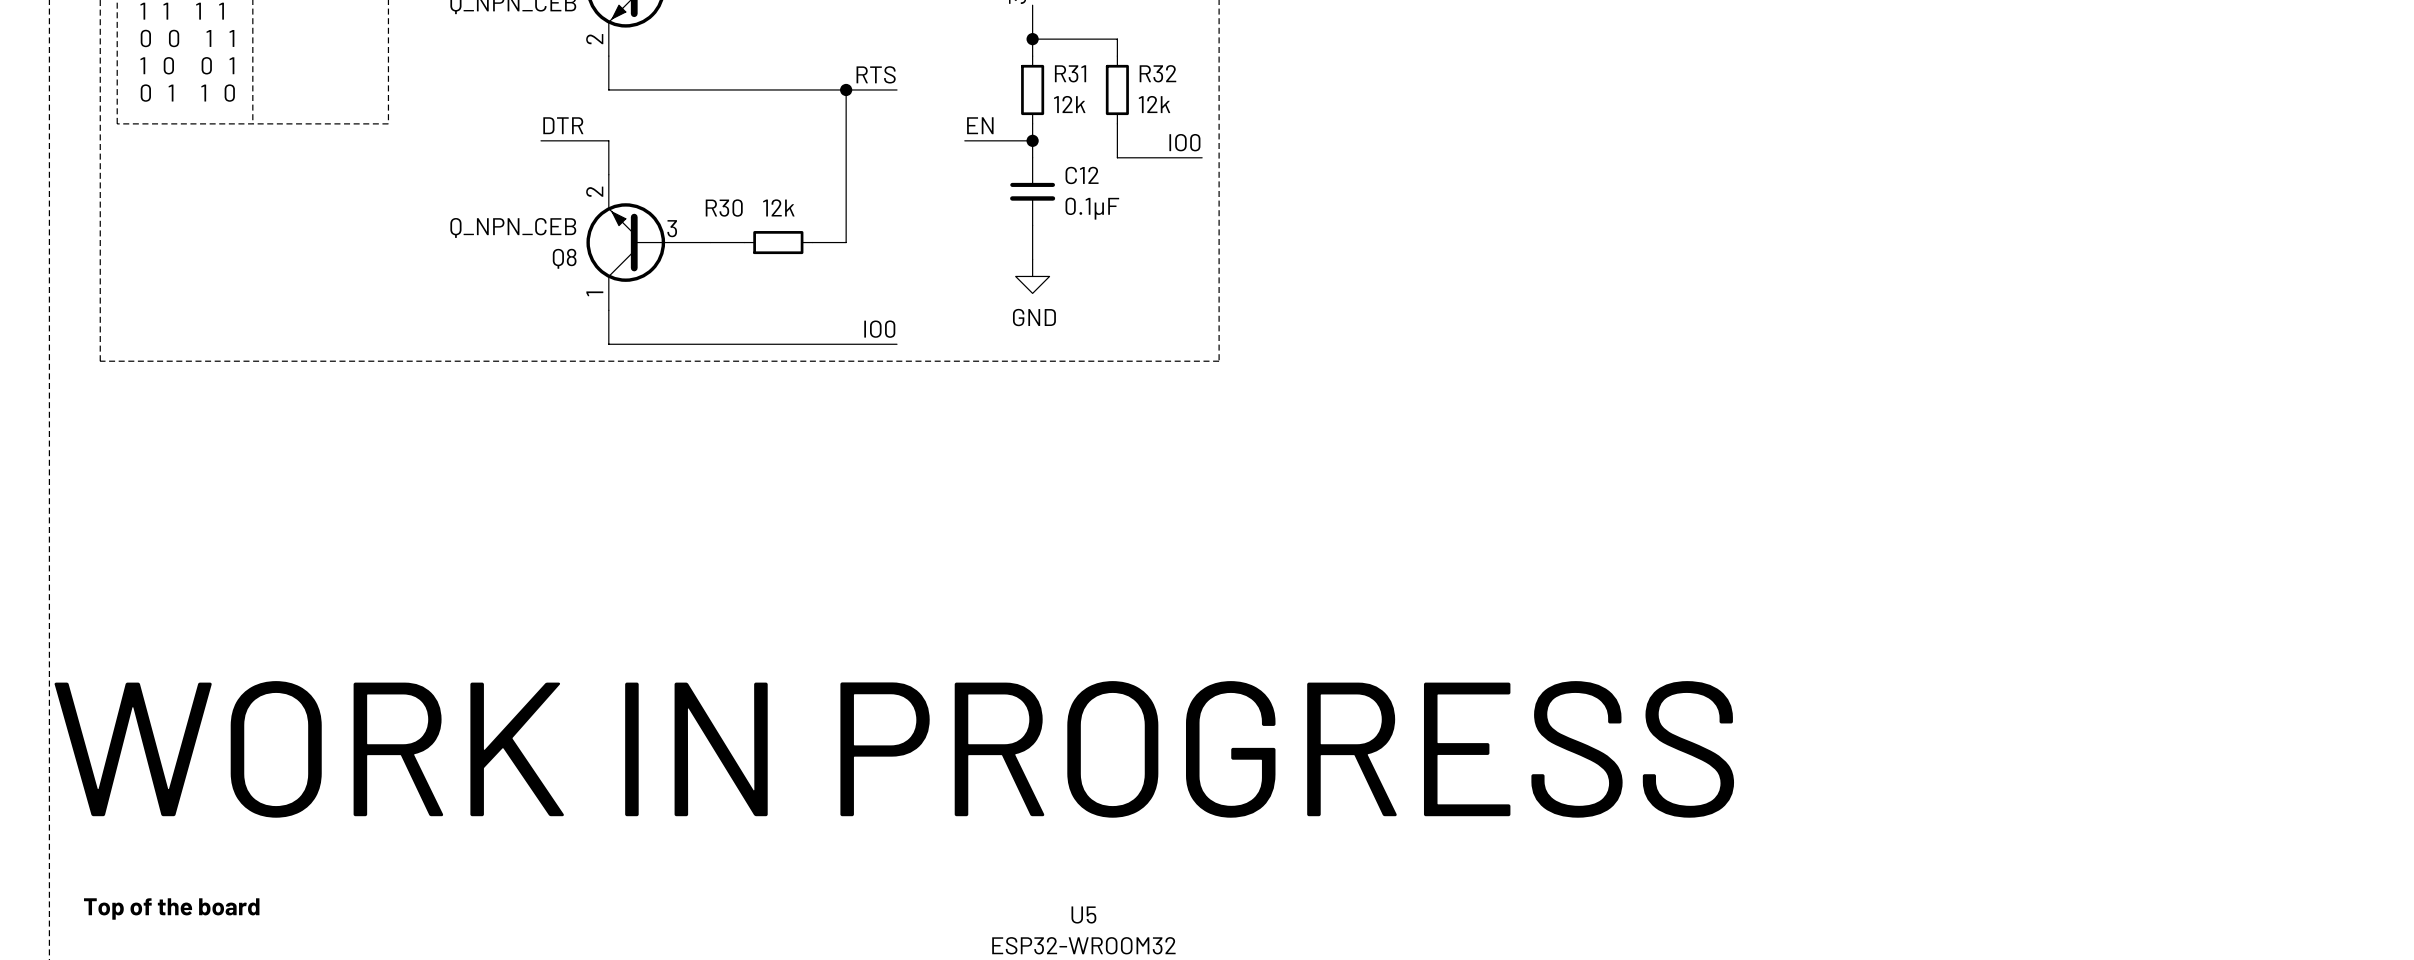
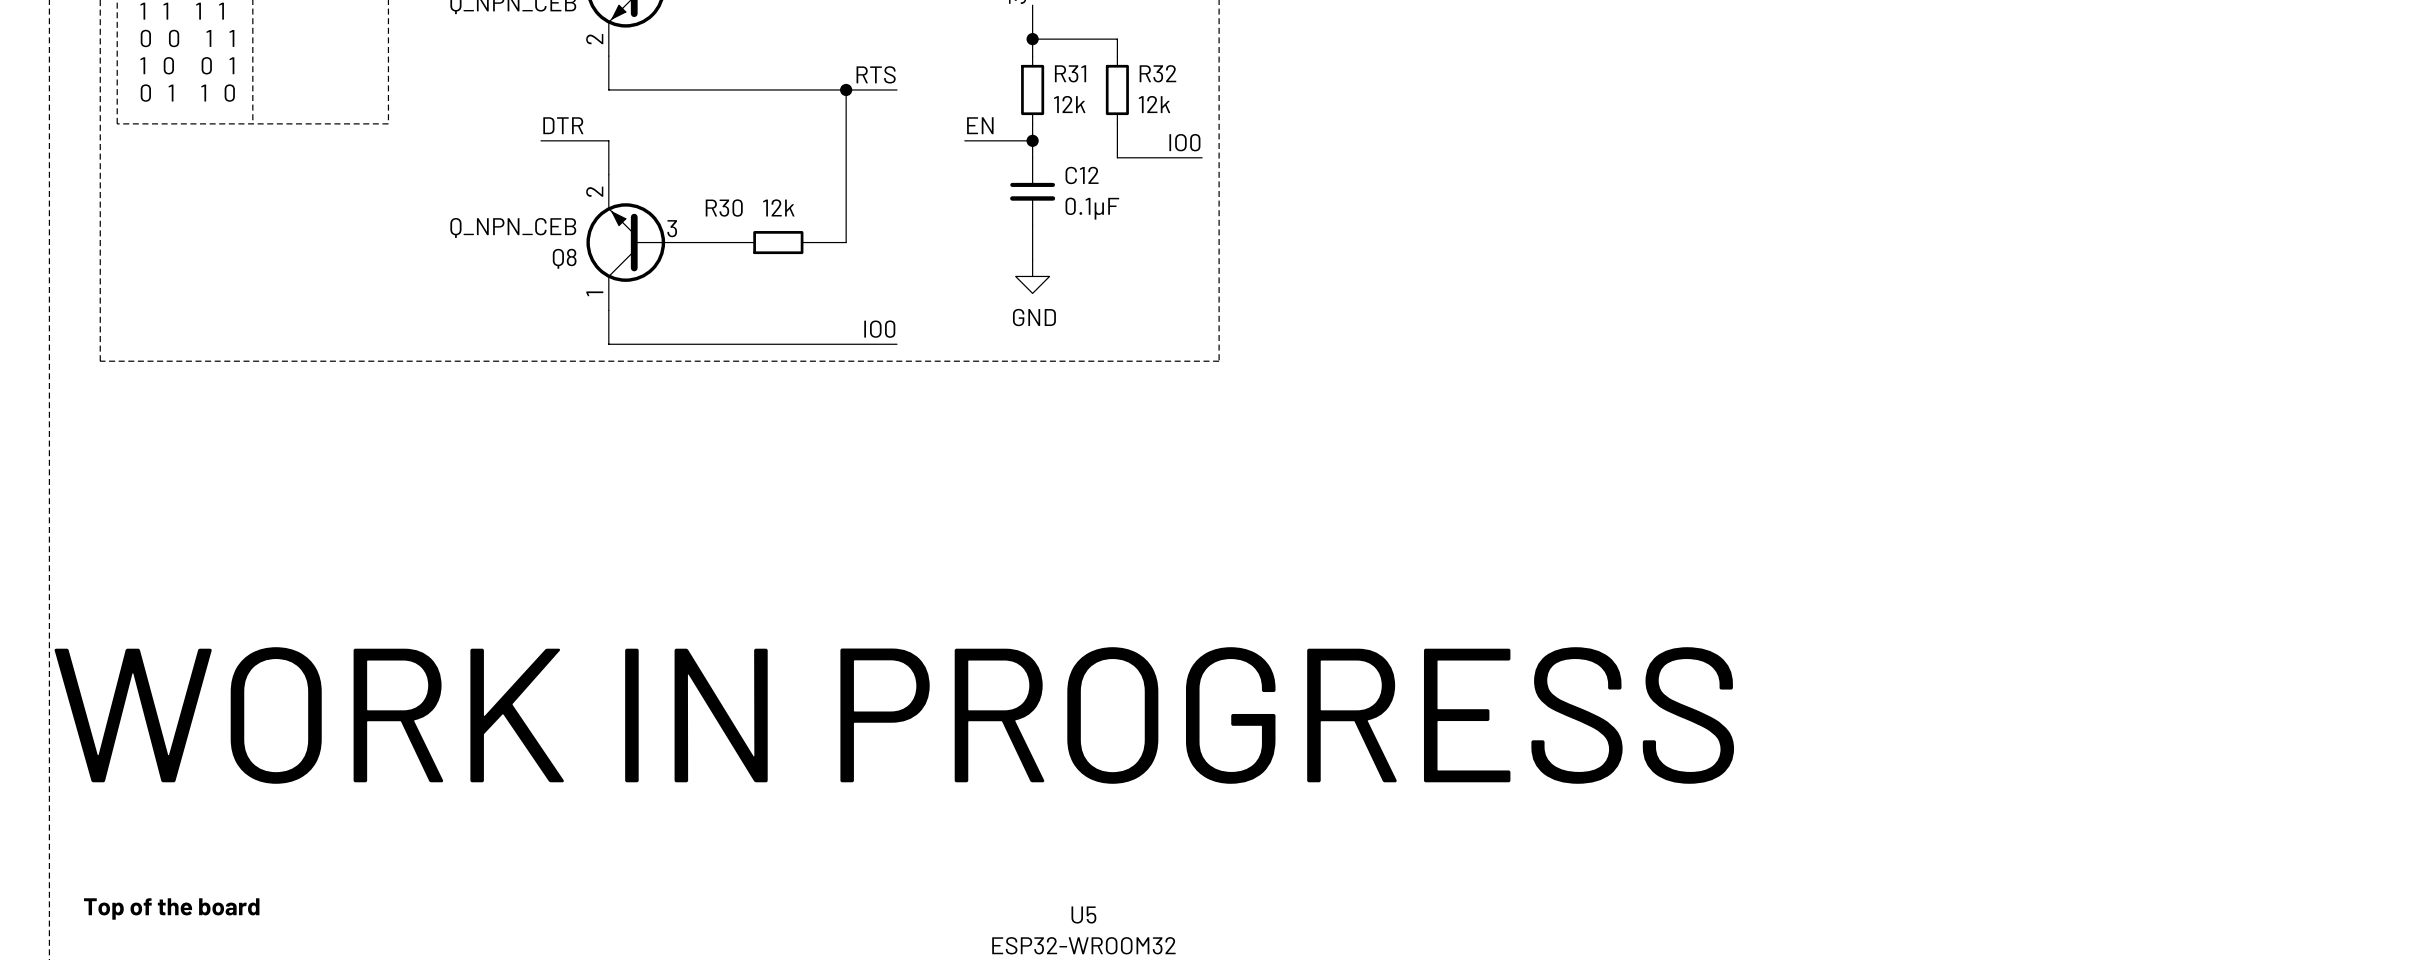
text position: WORK IN PROGRESS (894, 749) -> WORK IN PROGRESS (894, 715)

